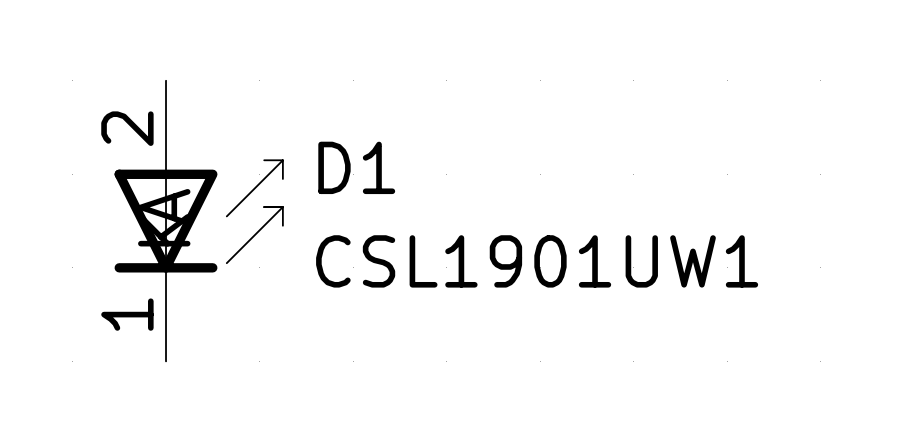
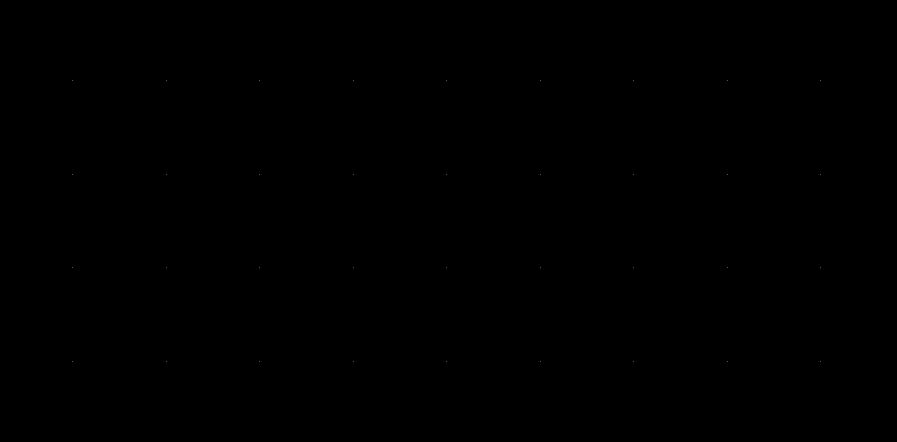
D1: CSL1901UW1 (198, 221) -> none

